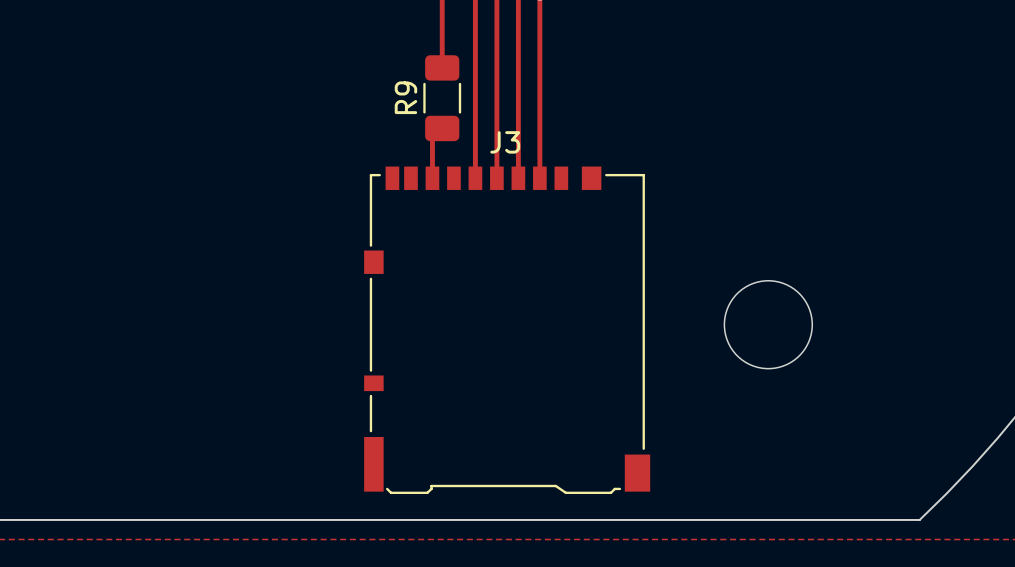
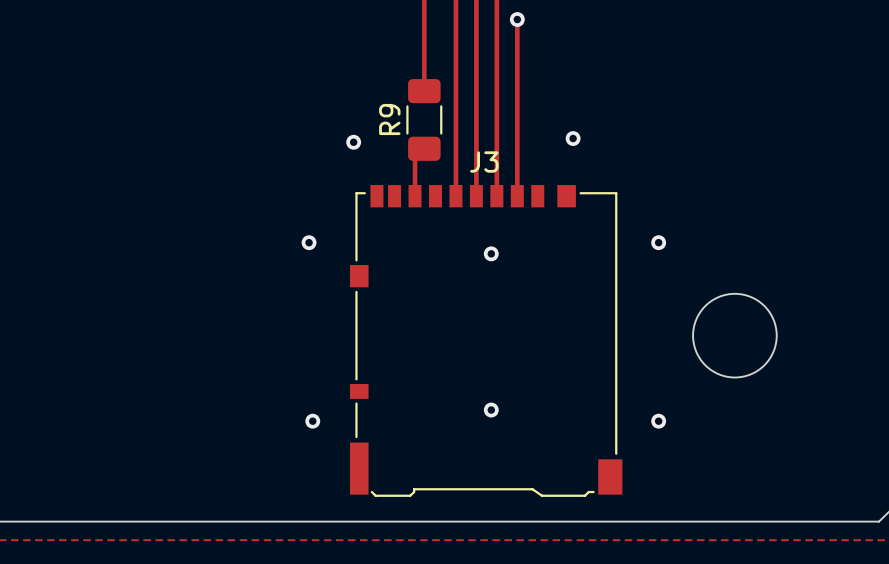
via: none -> (573, 138)
via: none -> (353, 142)
via: none -> (309, 242)
via: none -> (658, 242)
via: none -> (491, 253)
via: none -> (491, 410)
via: none -> (312, 421)
via: none -> (658, 421)

